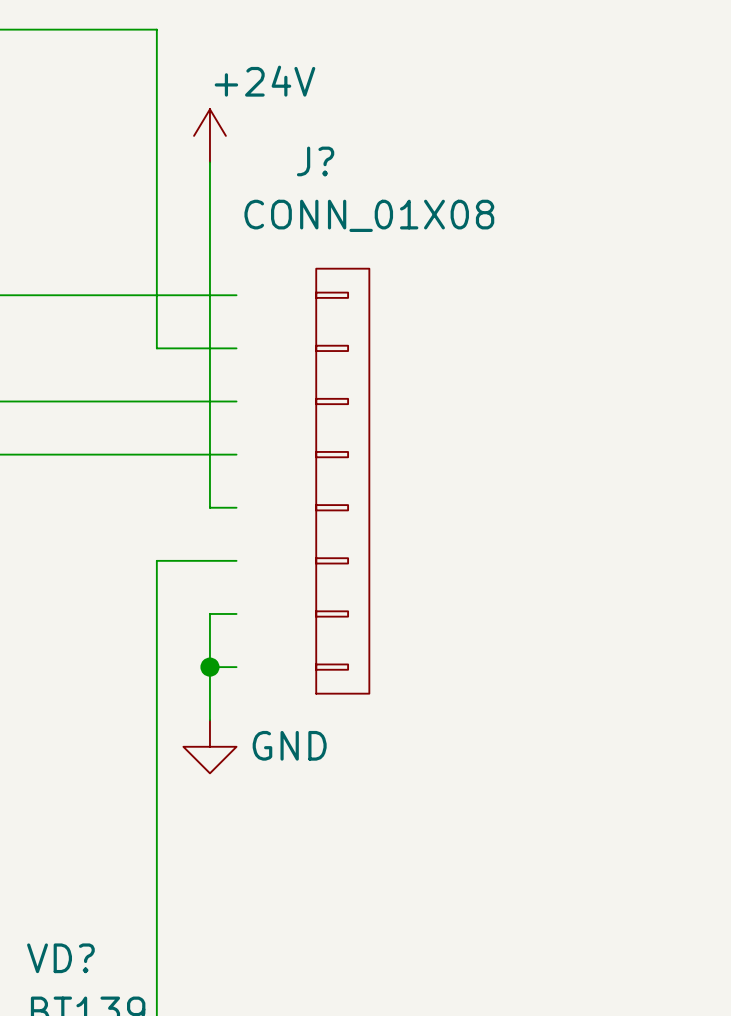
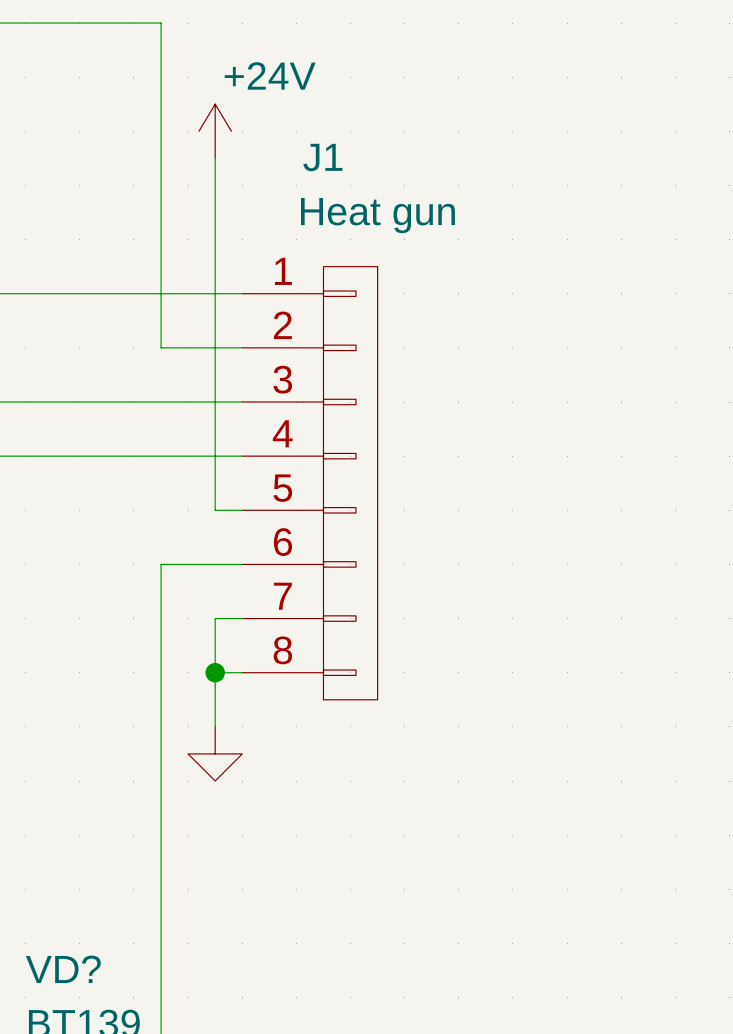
J1: none -> Heat gun (309, 483)
J?: CONN_01X08 (342, 481) -> none
power symbol text: GND (289, 745) -> none

